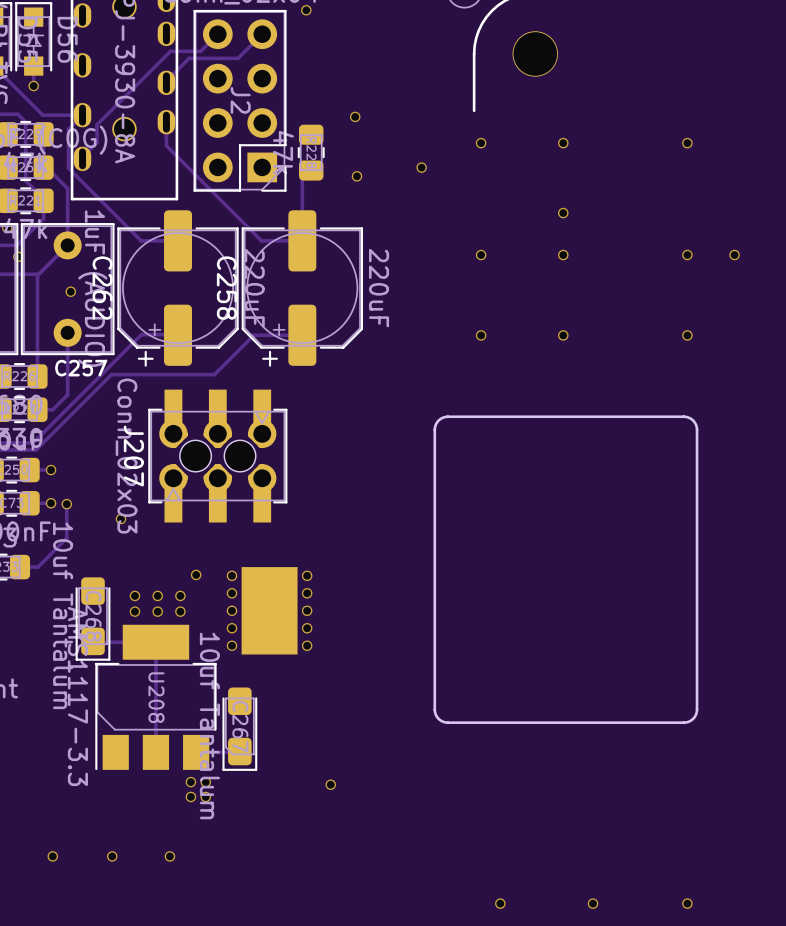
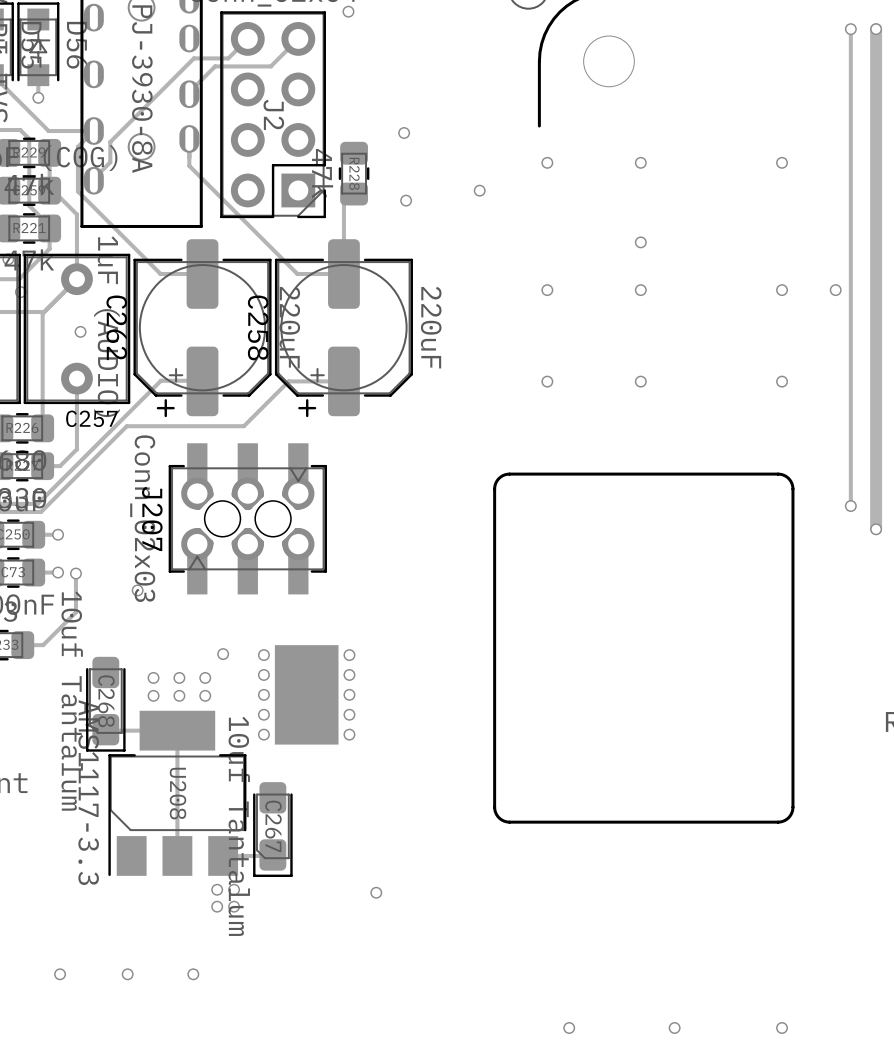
track: none -> (850, 29) (850, 506)
via: none -> (850, 29)
track: none -> (876, 29) (876, 529)
via: none -> (876, 29)
via: none -> (850, 506)
via: none -> (876, 529)

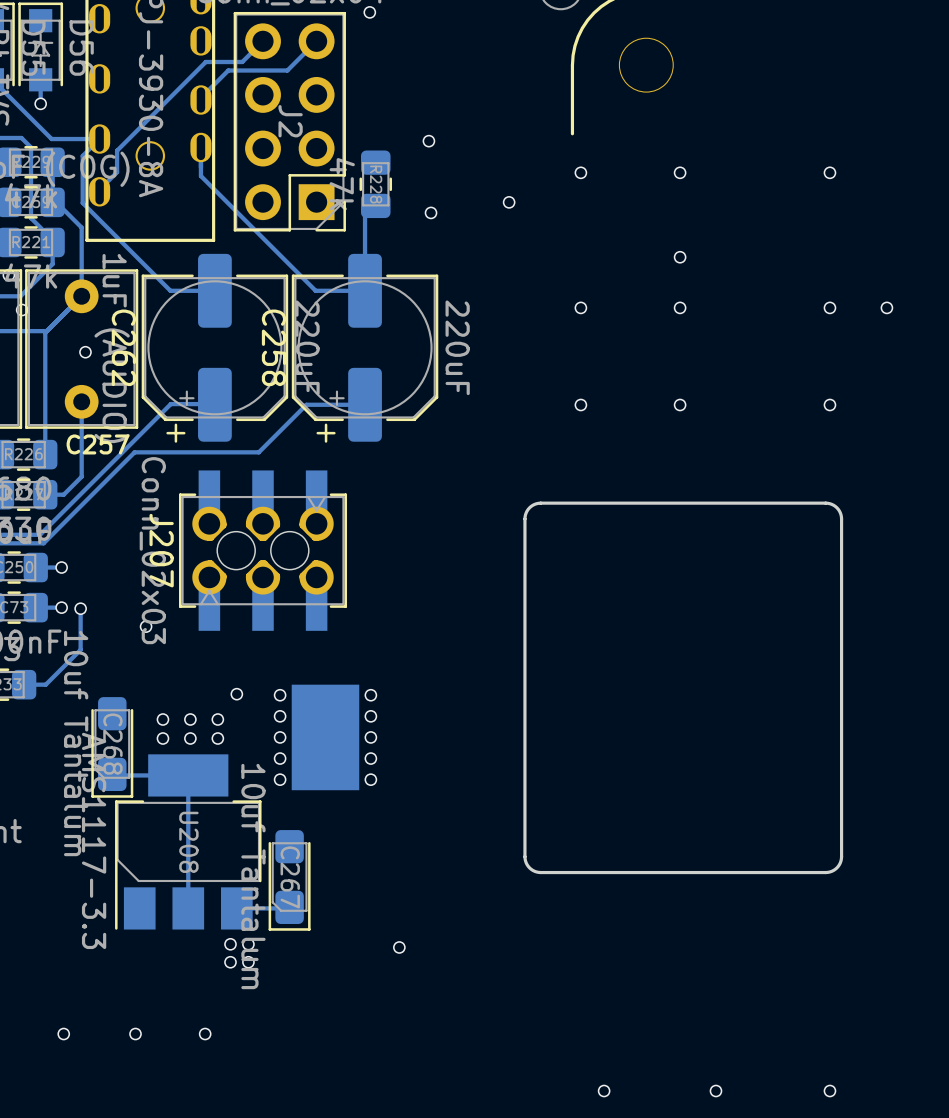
track: (850, 29) (850, 506) -> none
via: (850, 29) -> none
track: (876, 29) (876, 529) -> none
via: (876, 29) -> none
via: (850, 506) -> none
via: (876, 529) -> none

